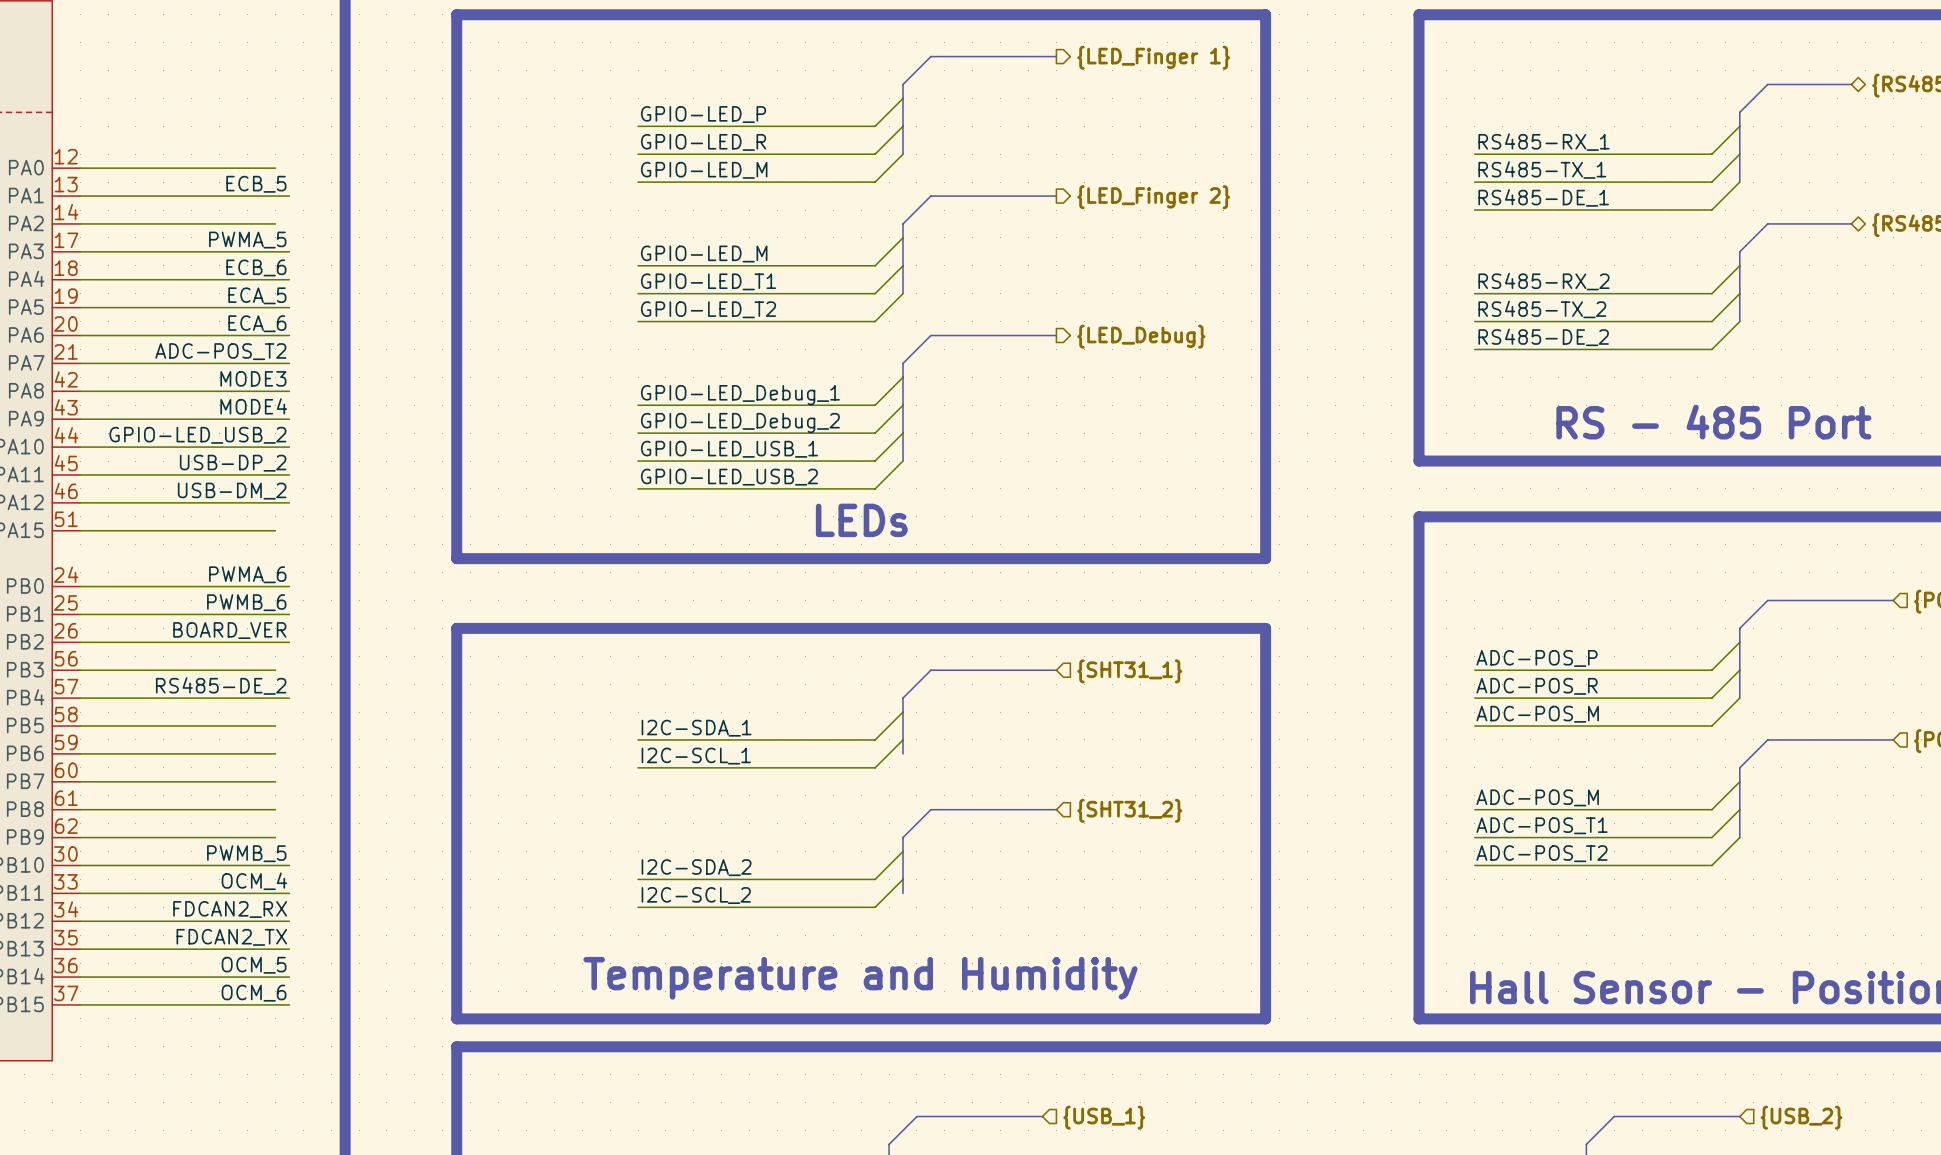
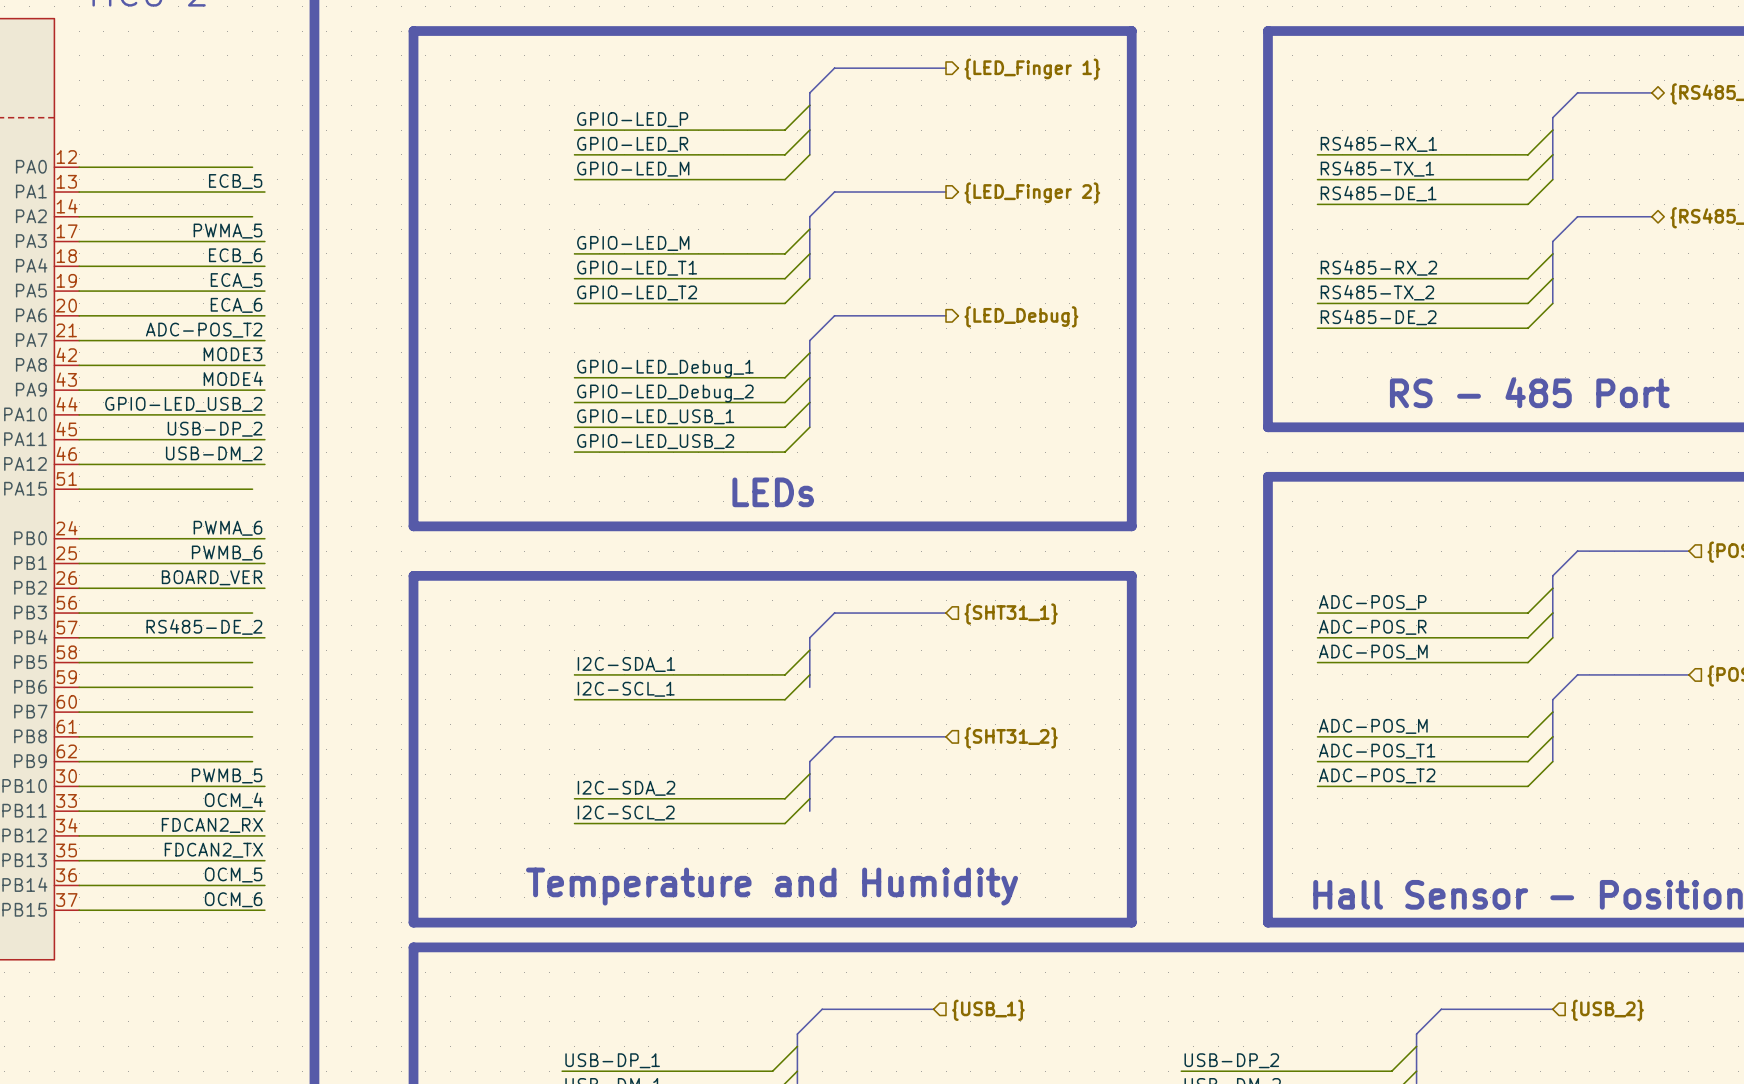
text position: LEDs (861, 520) -> LEDs (773, 492)
line: (456, 558) (1265, 558) -> (413, 513) (413, 526) (1131, 526) (1131, 513)

